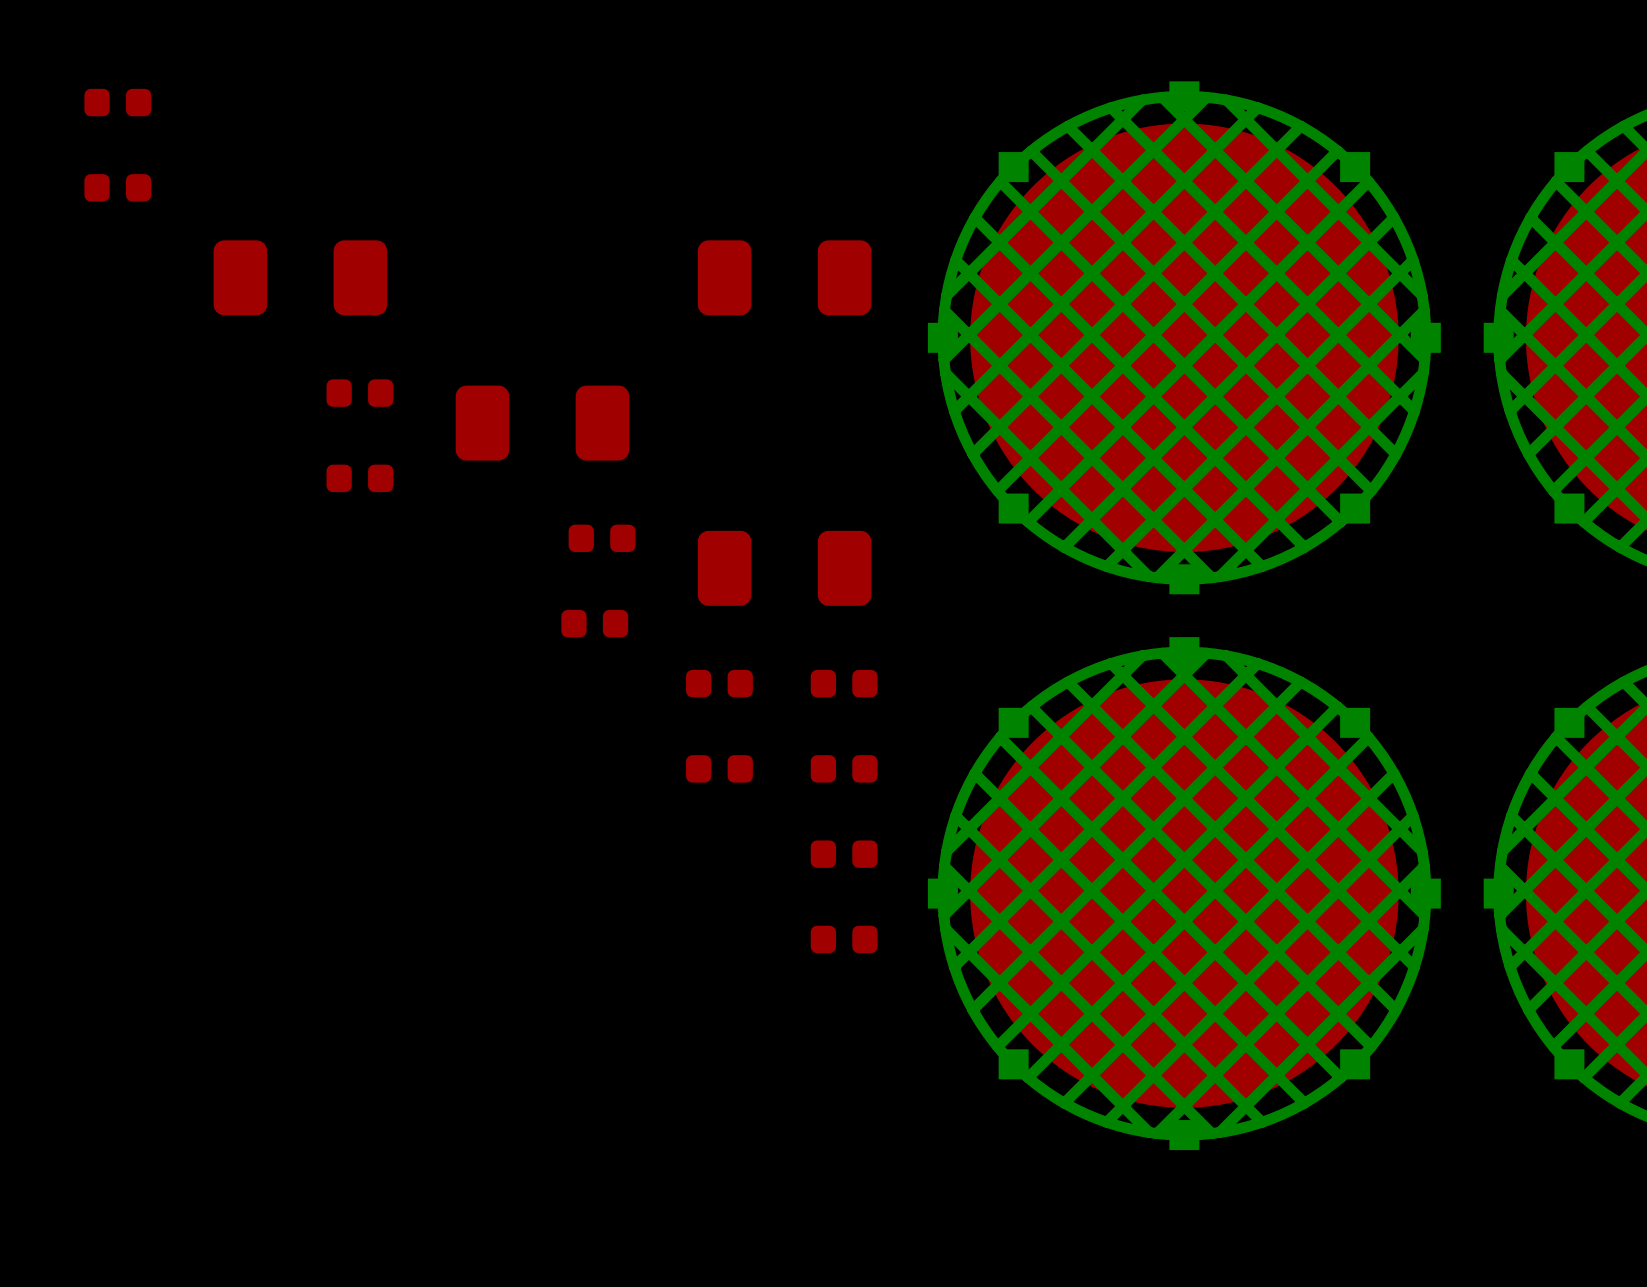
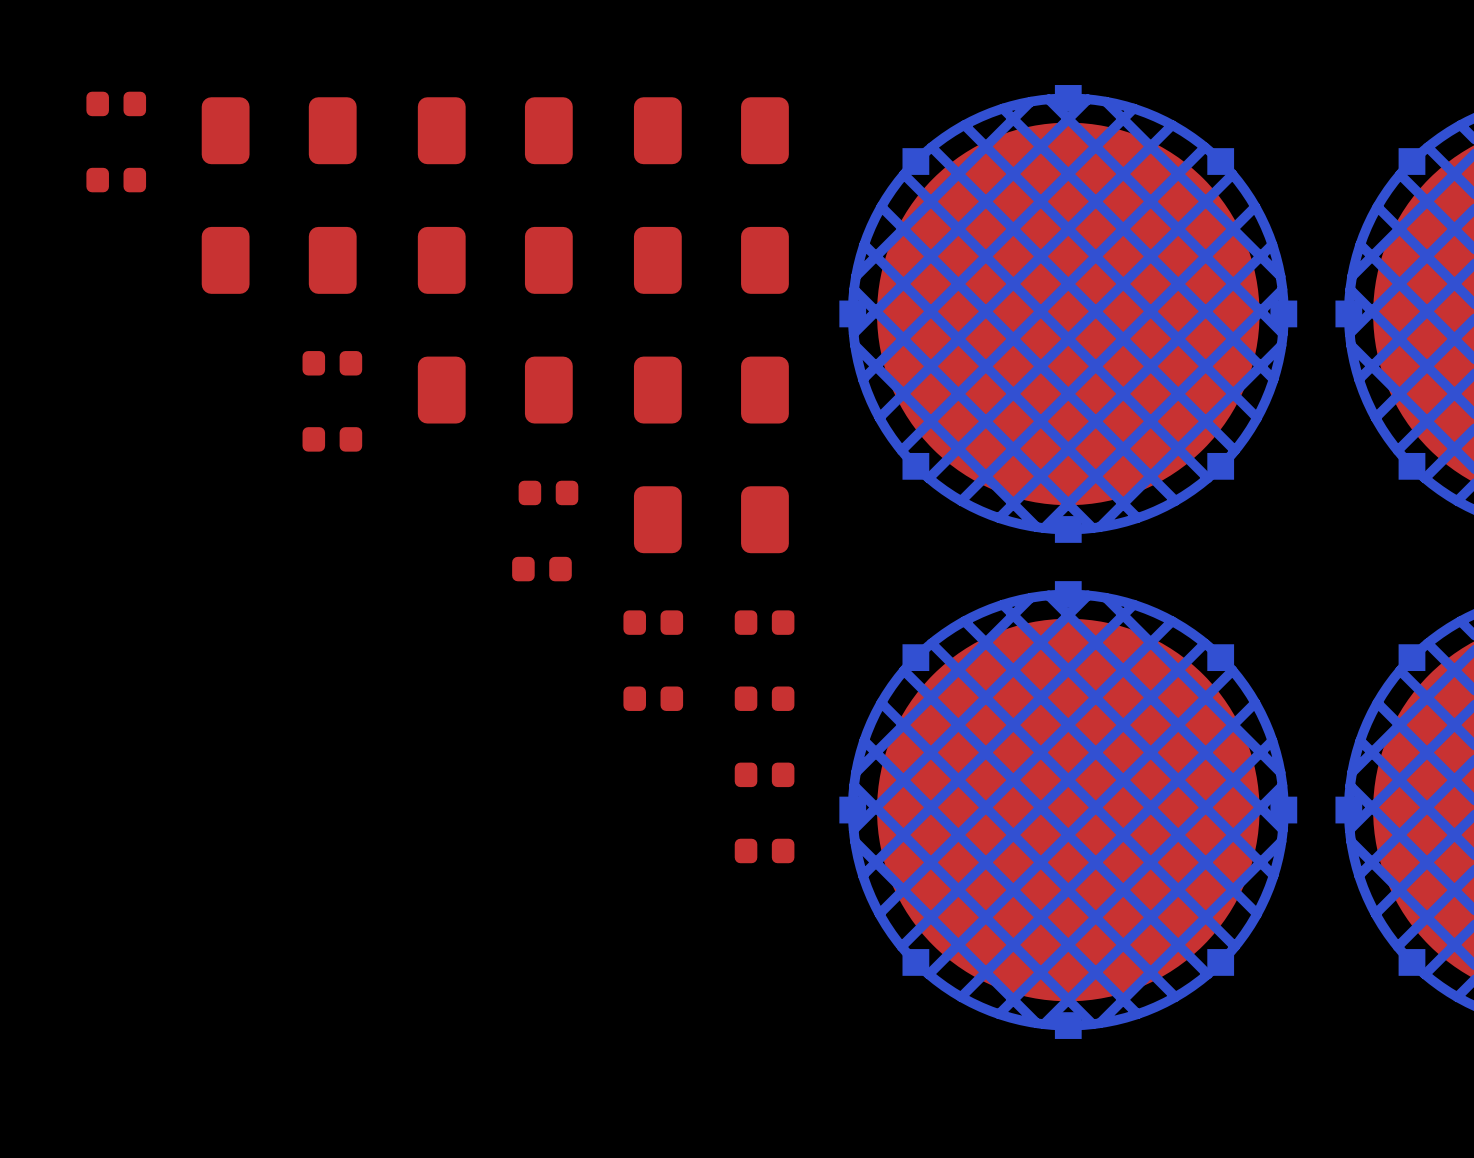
part: none -> (279, 130)
part: none -> (495, 130)
part: none -> (711, 130)
part: none -> (495, 260)
part: none -> (711, 390)

